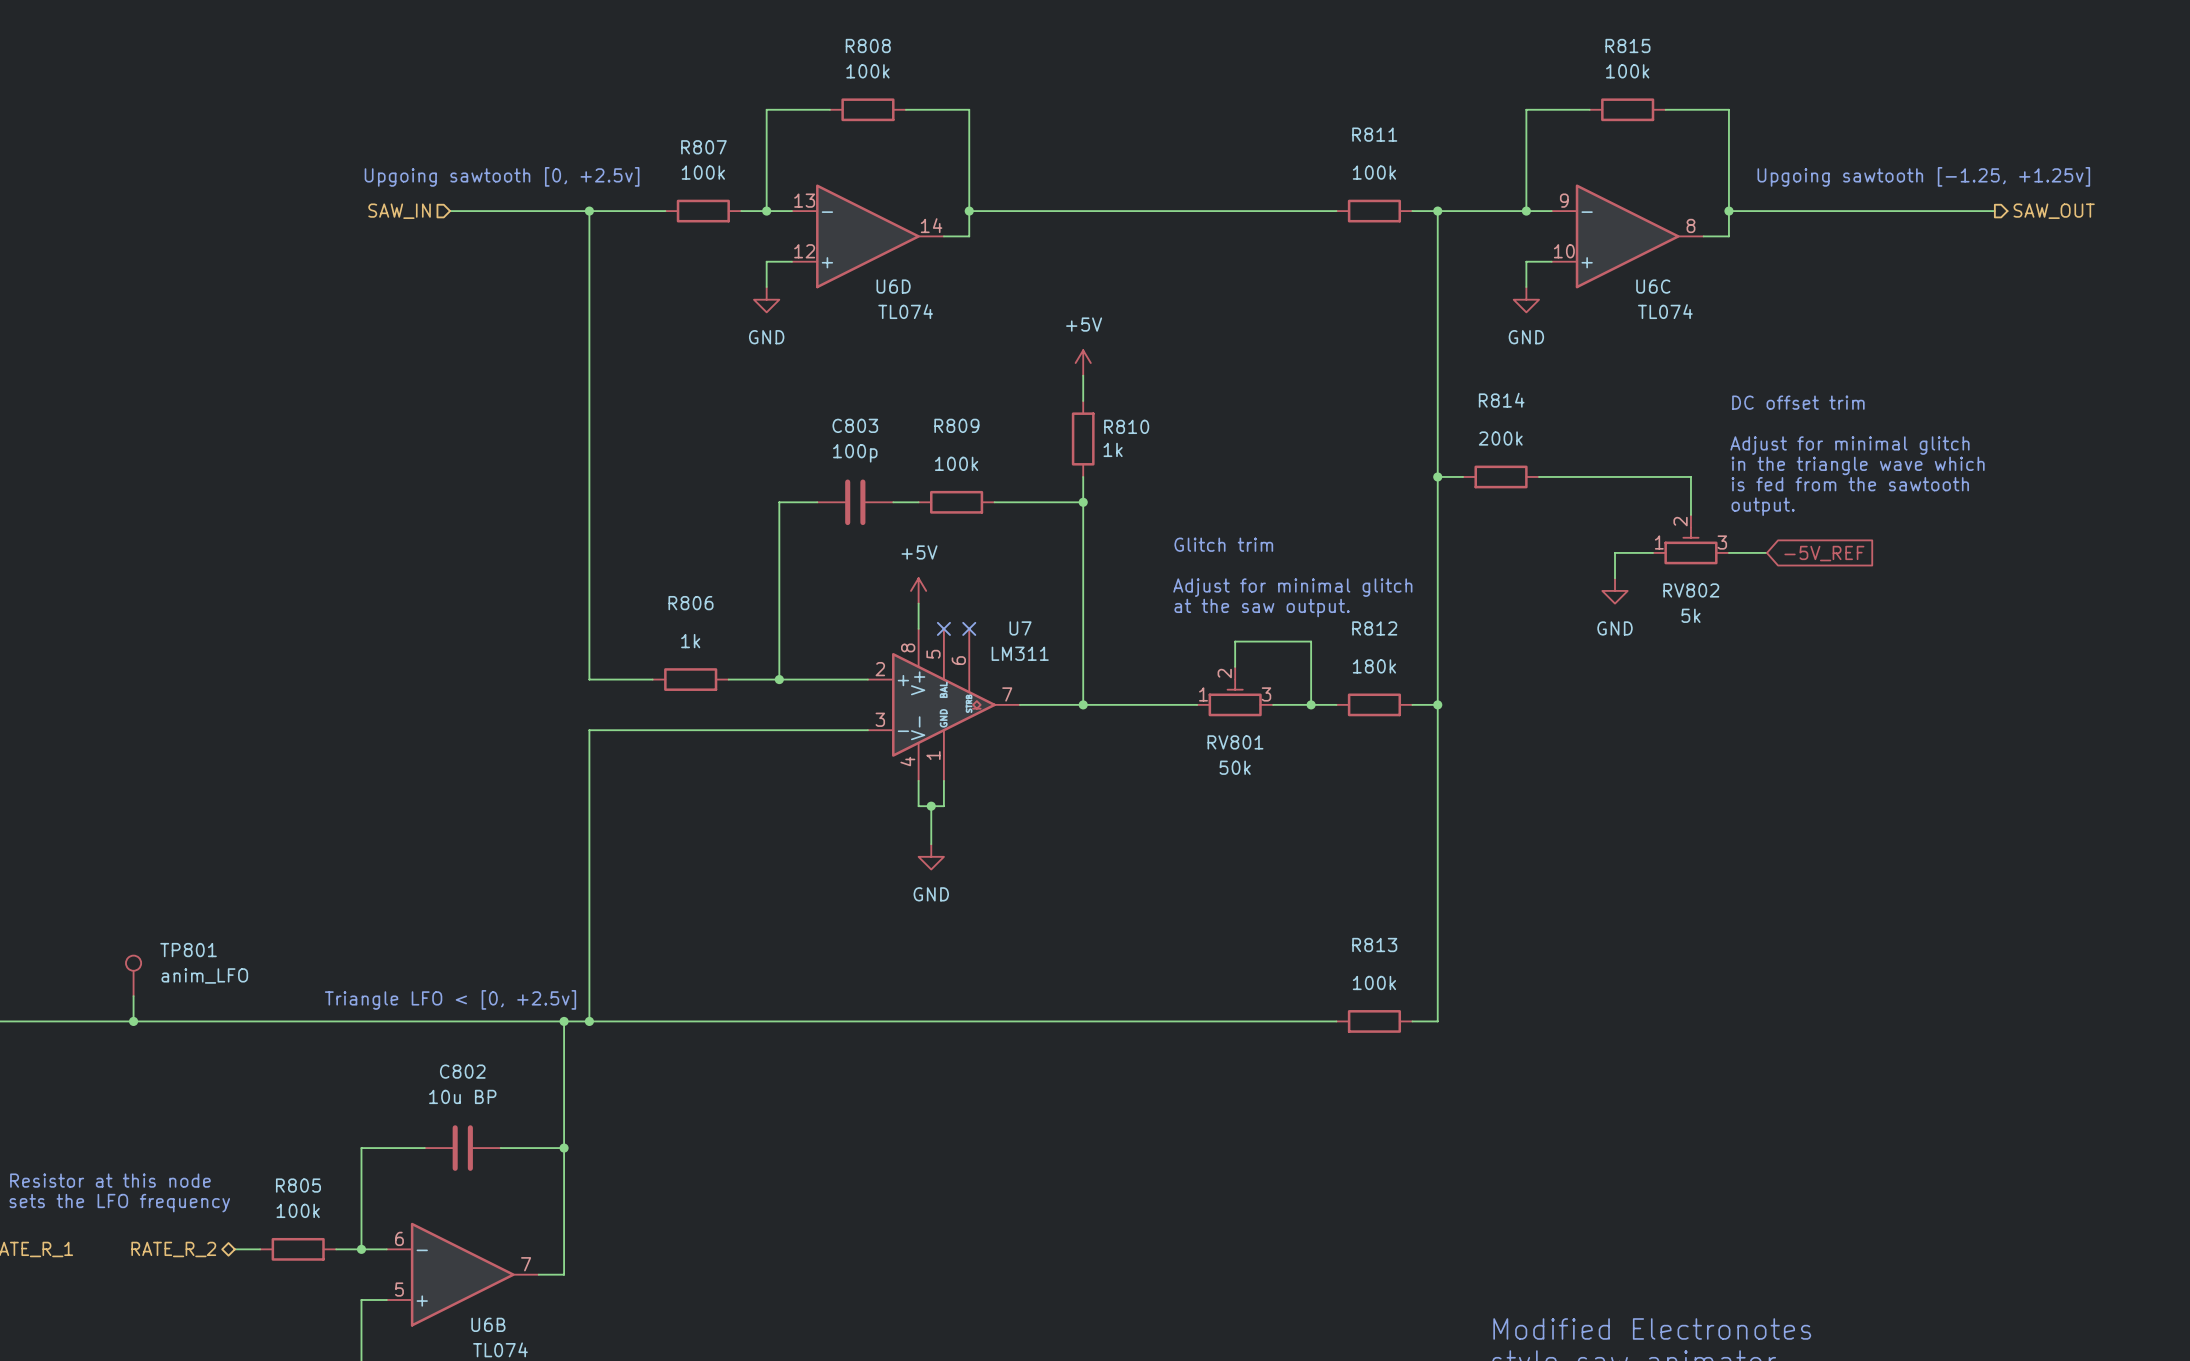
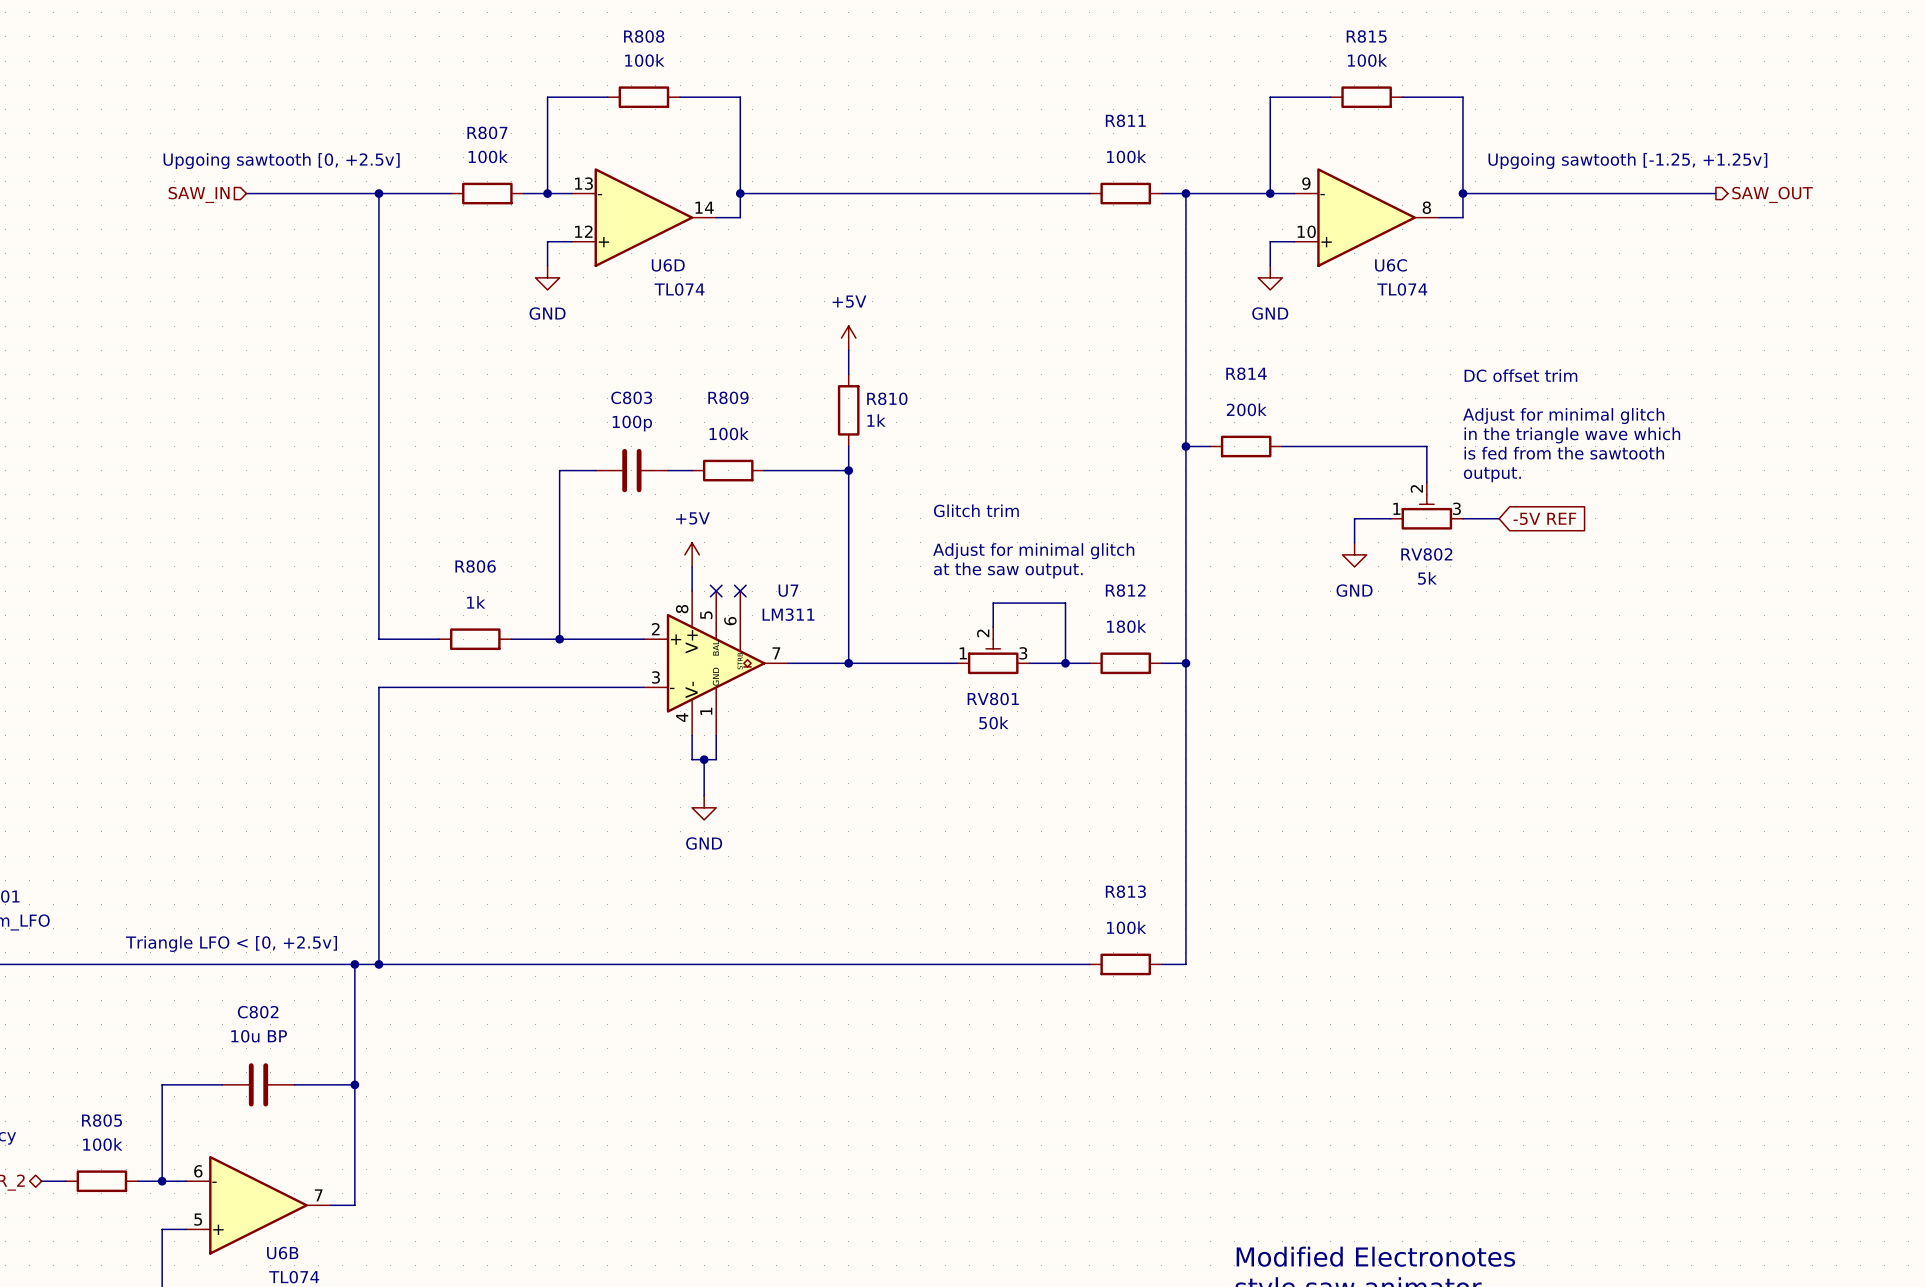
global label: -5V_REF (1824, 553) -> -5V REF (1544, 518)

